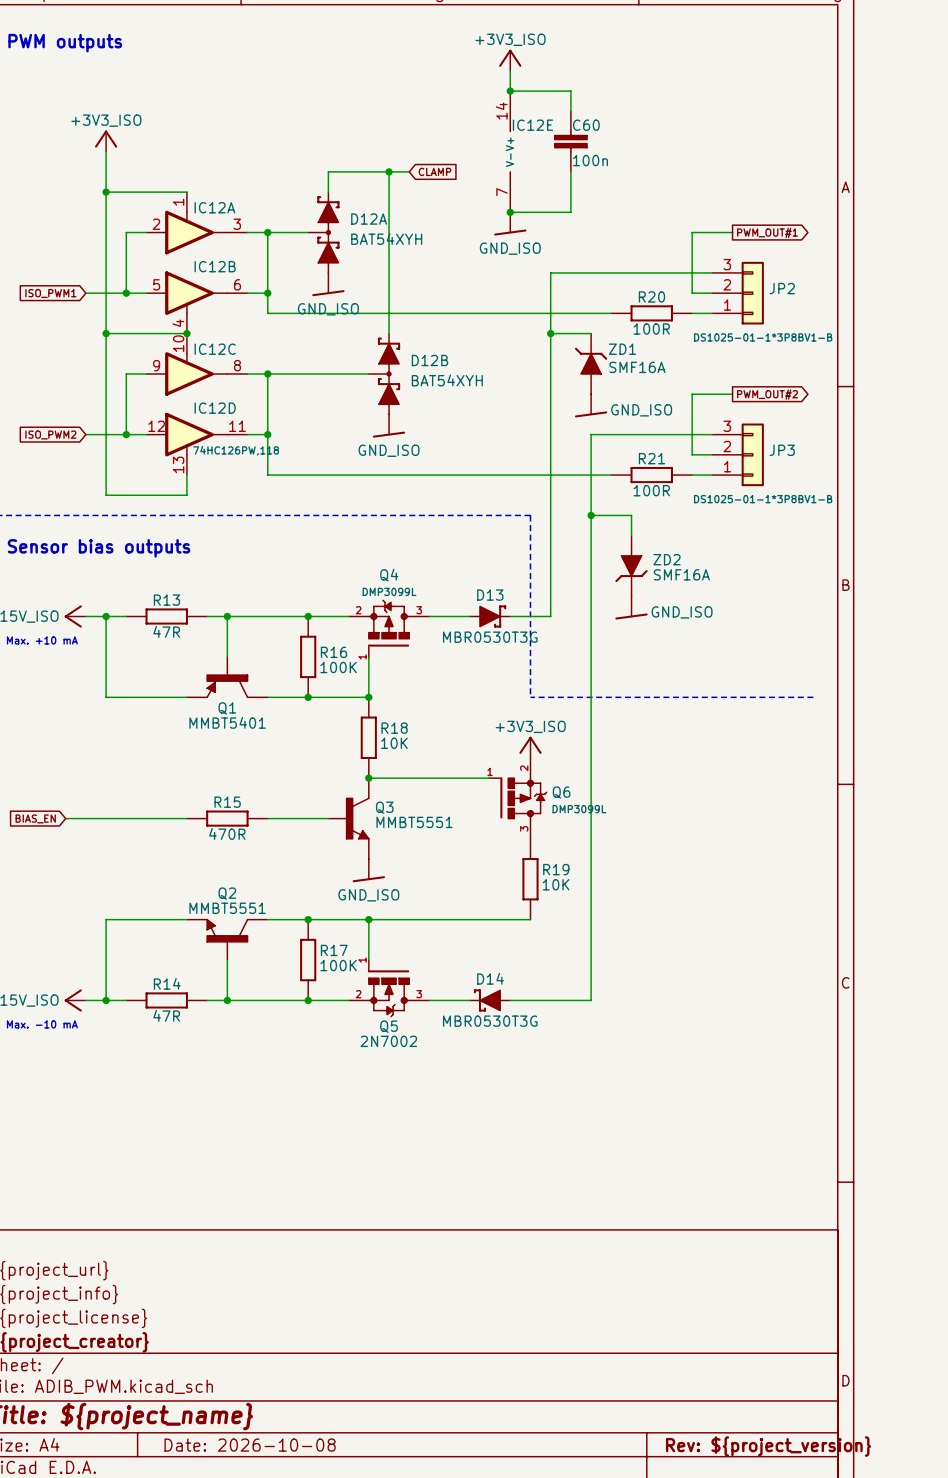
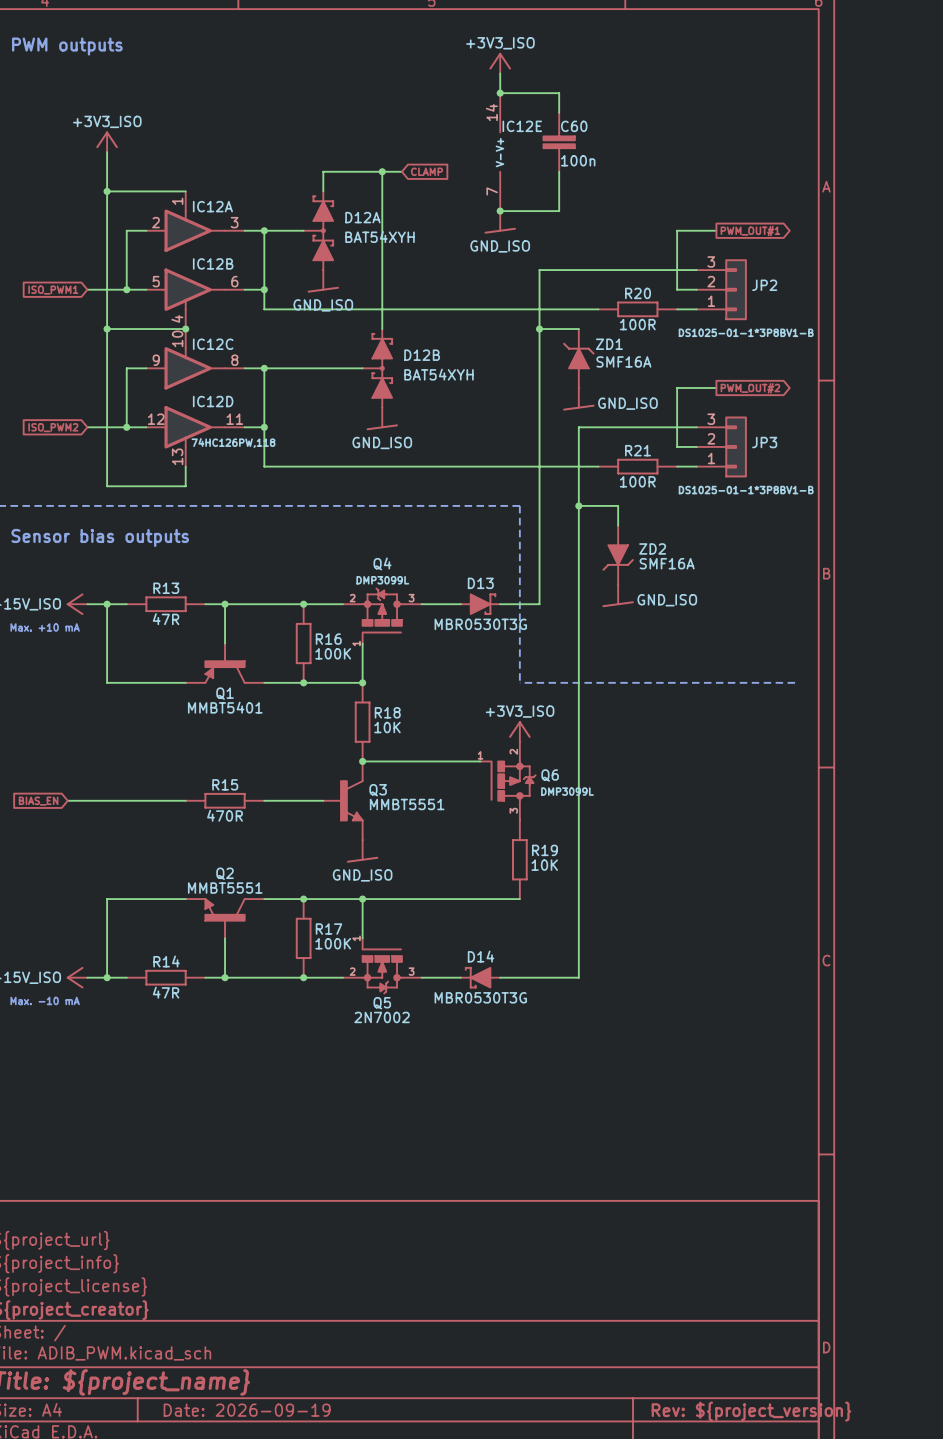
title block: Date: 2026-10-08 (250, 1445) -> Date: 2026-09-19 (247, 1410)

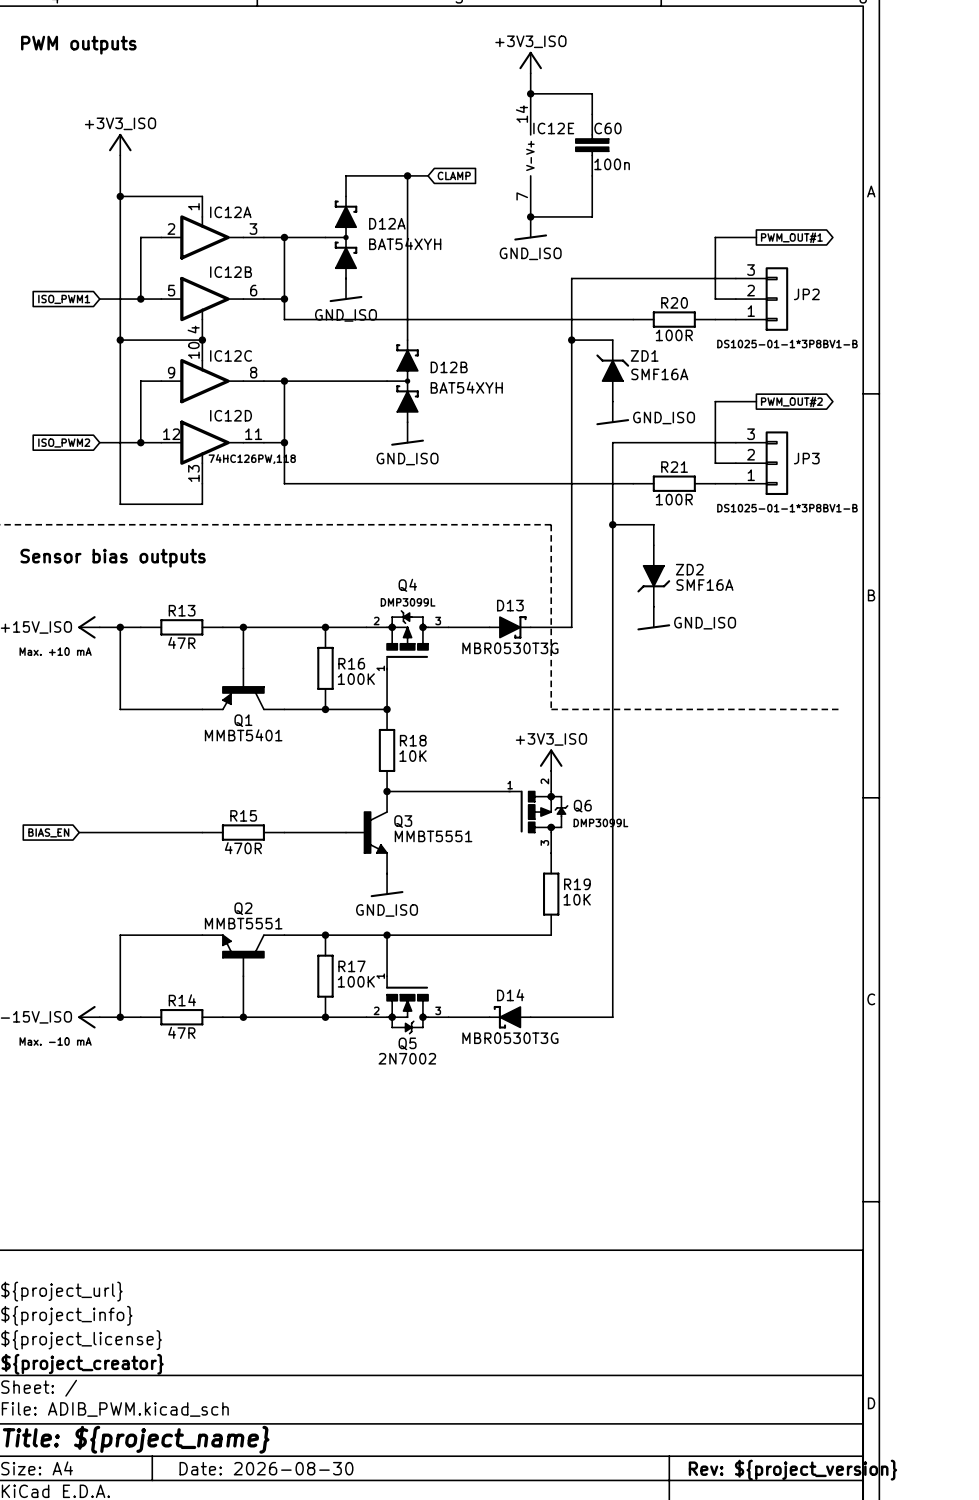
title block: Date: 2026-09-19 (247, 1410) -> Date: 2026-08-30 (266, 1468)

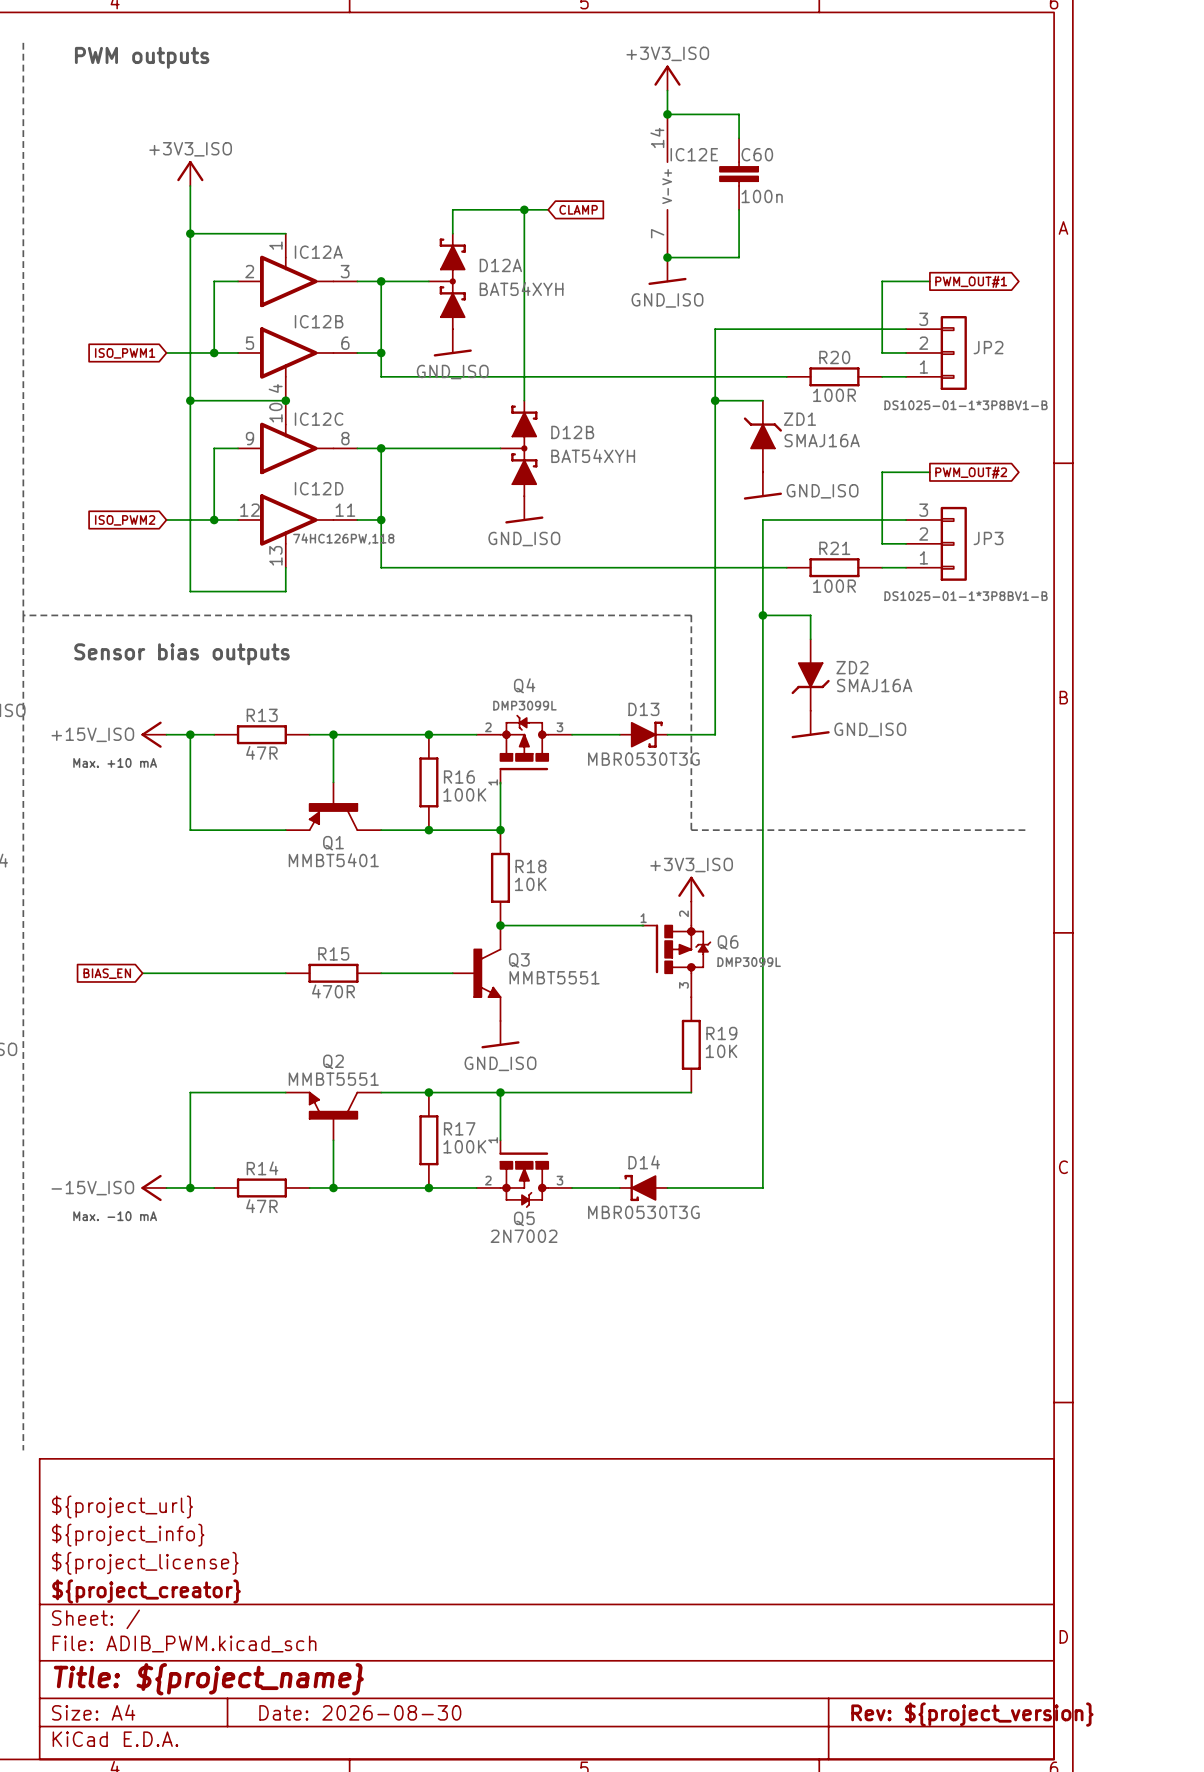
ZD1 value: SMF16A (659, 374) -> SMAJ16A (822, 440)
ZD2 value: SMF16A (704, 585) -> SMAJ16A (874, 685)

